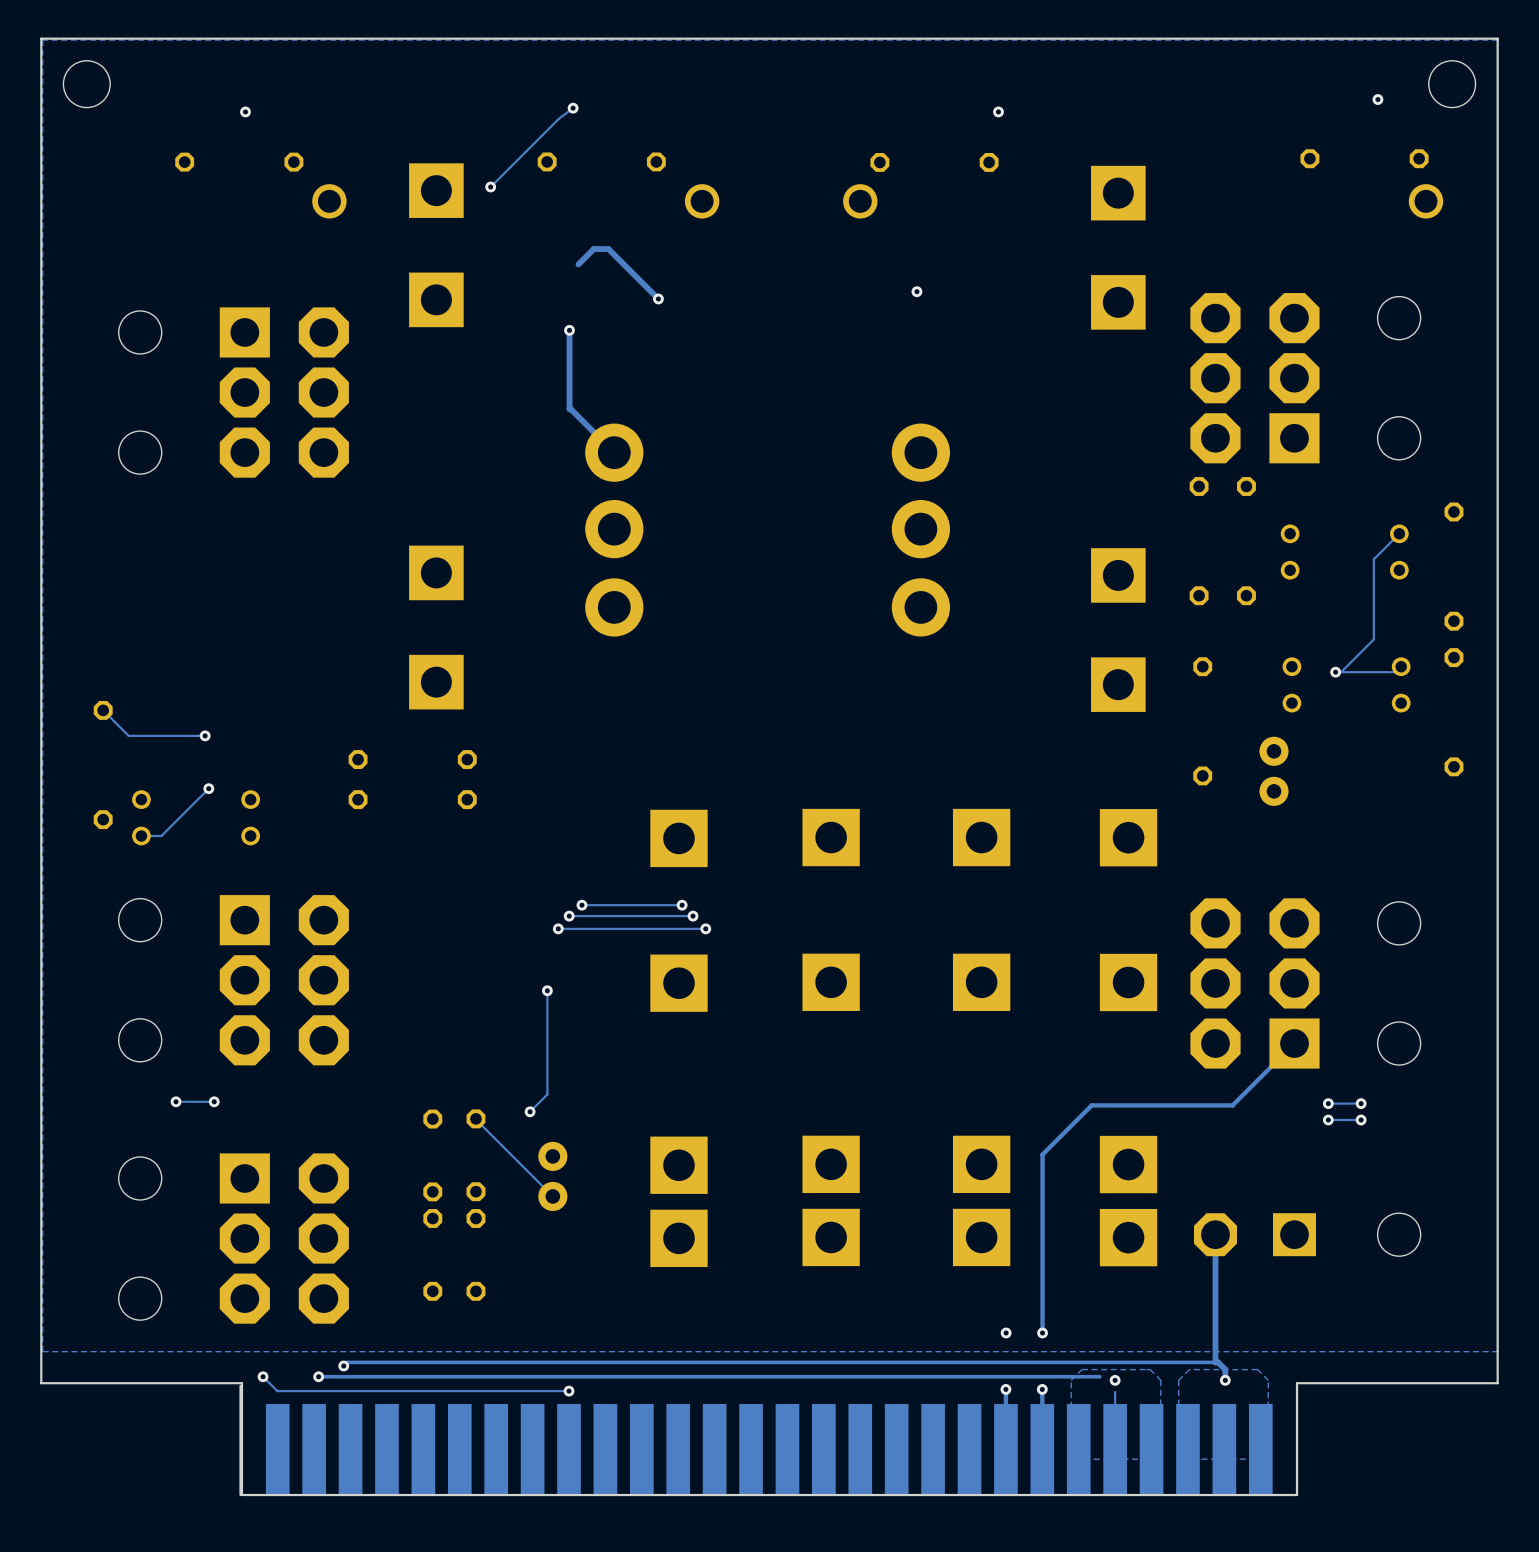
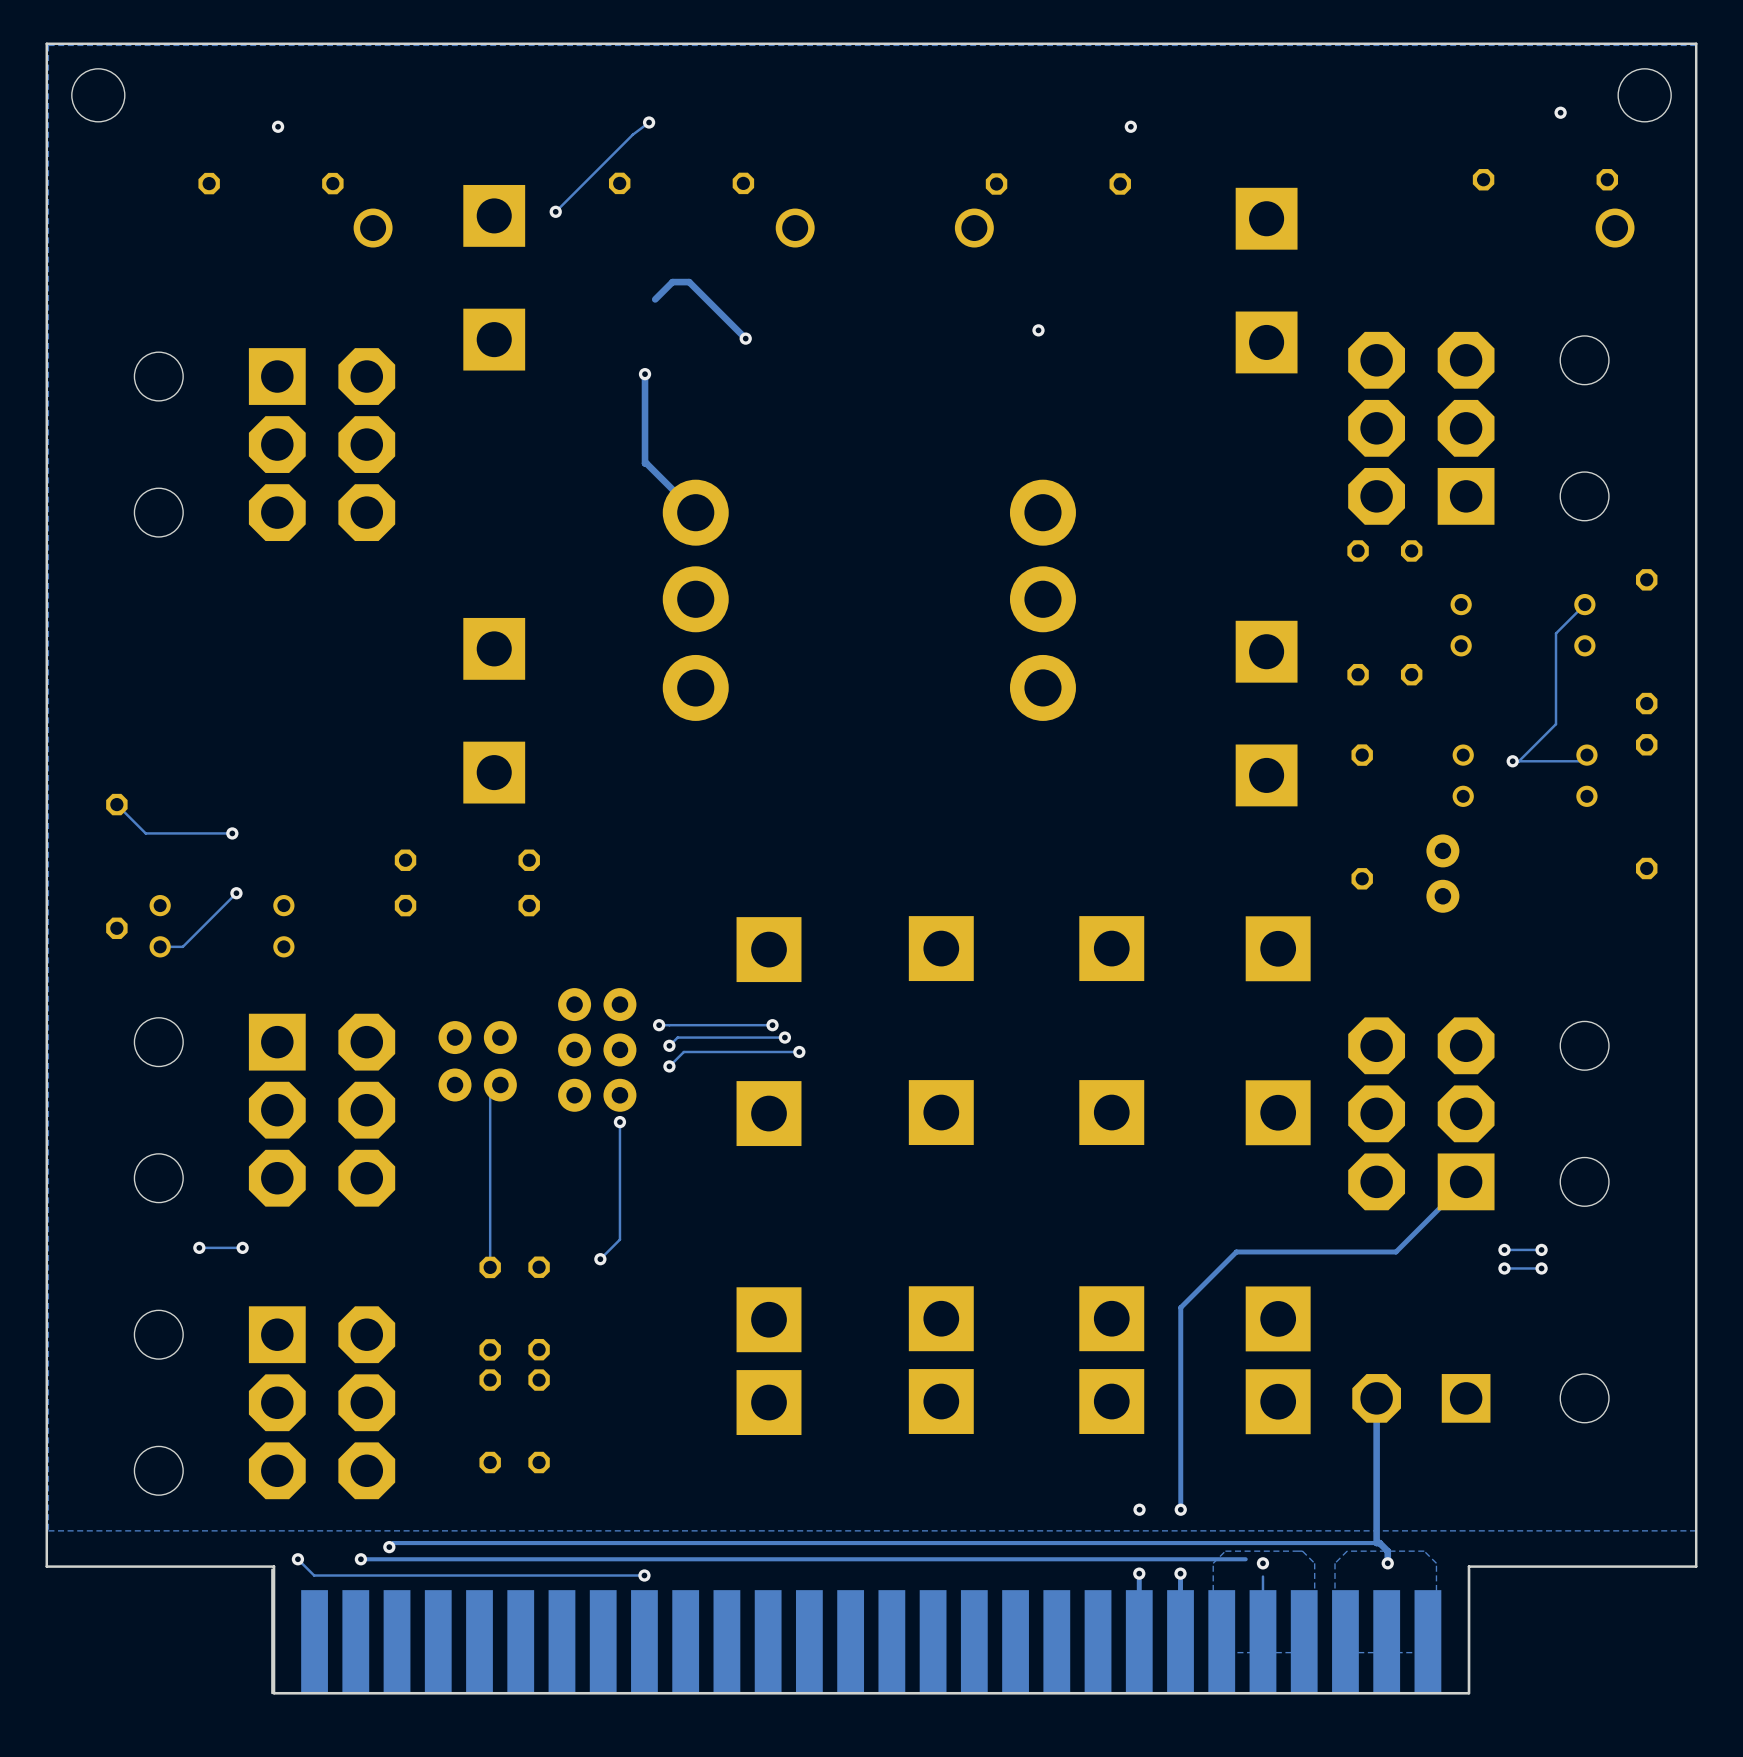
part: none -> (597, 1004)
part: none -> (477, 1037)
via: (569, 916) -> none
track: (598, 916) (569, 916) -> (677, 1037) (669, 1045)
via: none -> (669, 1045)
part: none -> (597, 1049)
via: (558, 928) -> none
track: (603, 928) (558, 928) -> (683, 1051) (669, 1066)
via: none -> (669, 1066)
part: none -> (477, 1084)
track: none -> (500, 1084) (490, 1095) (490, 1267)
part: none -> (597, 1095)
track: (475, 1118) (552, 1196) -> none
part: (552, 1176) -> none

